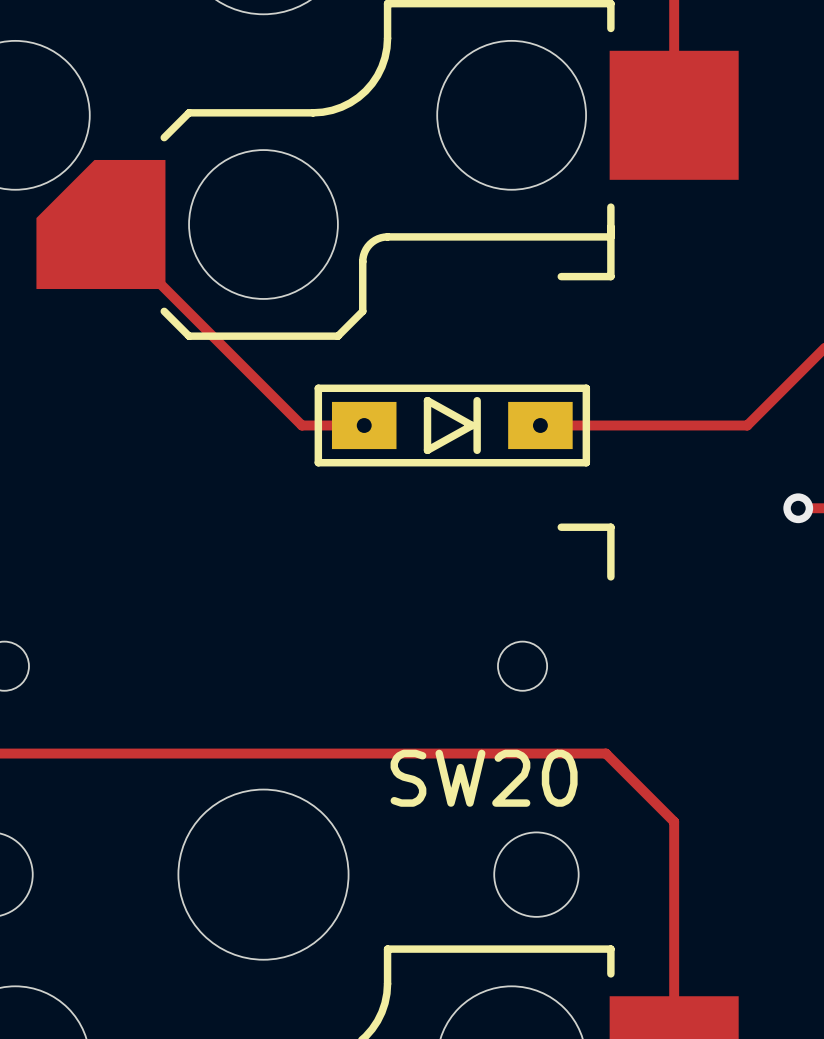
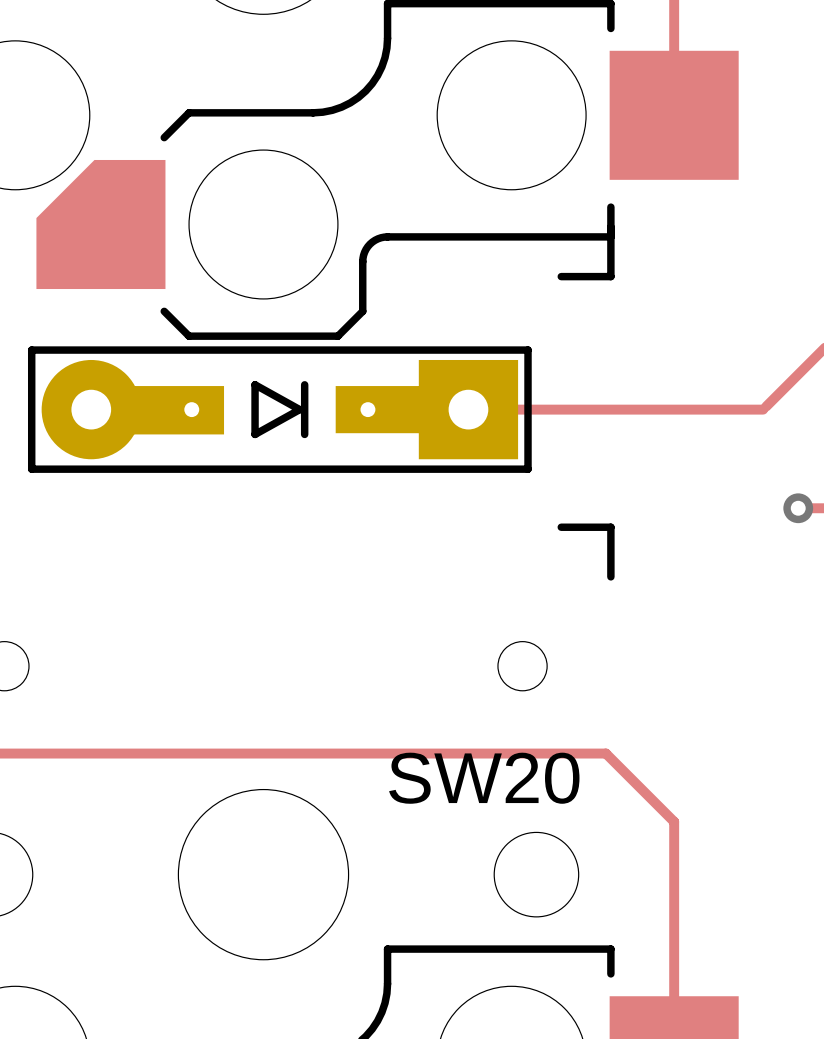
track: (100, 224) (301, 425) (364, 425) -> none
track: (766, 406) (747, 425) (540, 425) -> none
part: none -> (279, 409)
track: none -> (468, 409) (763, 409)
part: (452, 425) -> none

